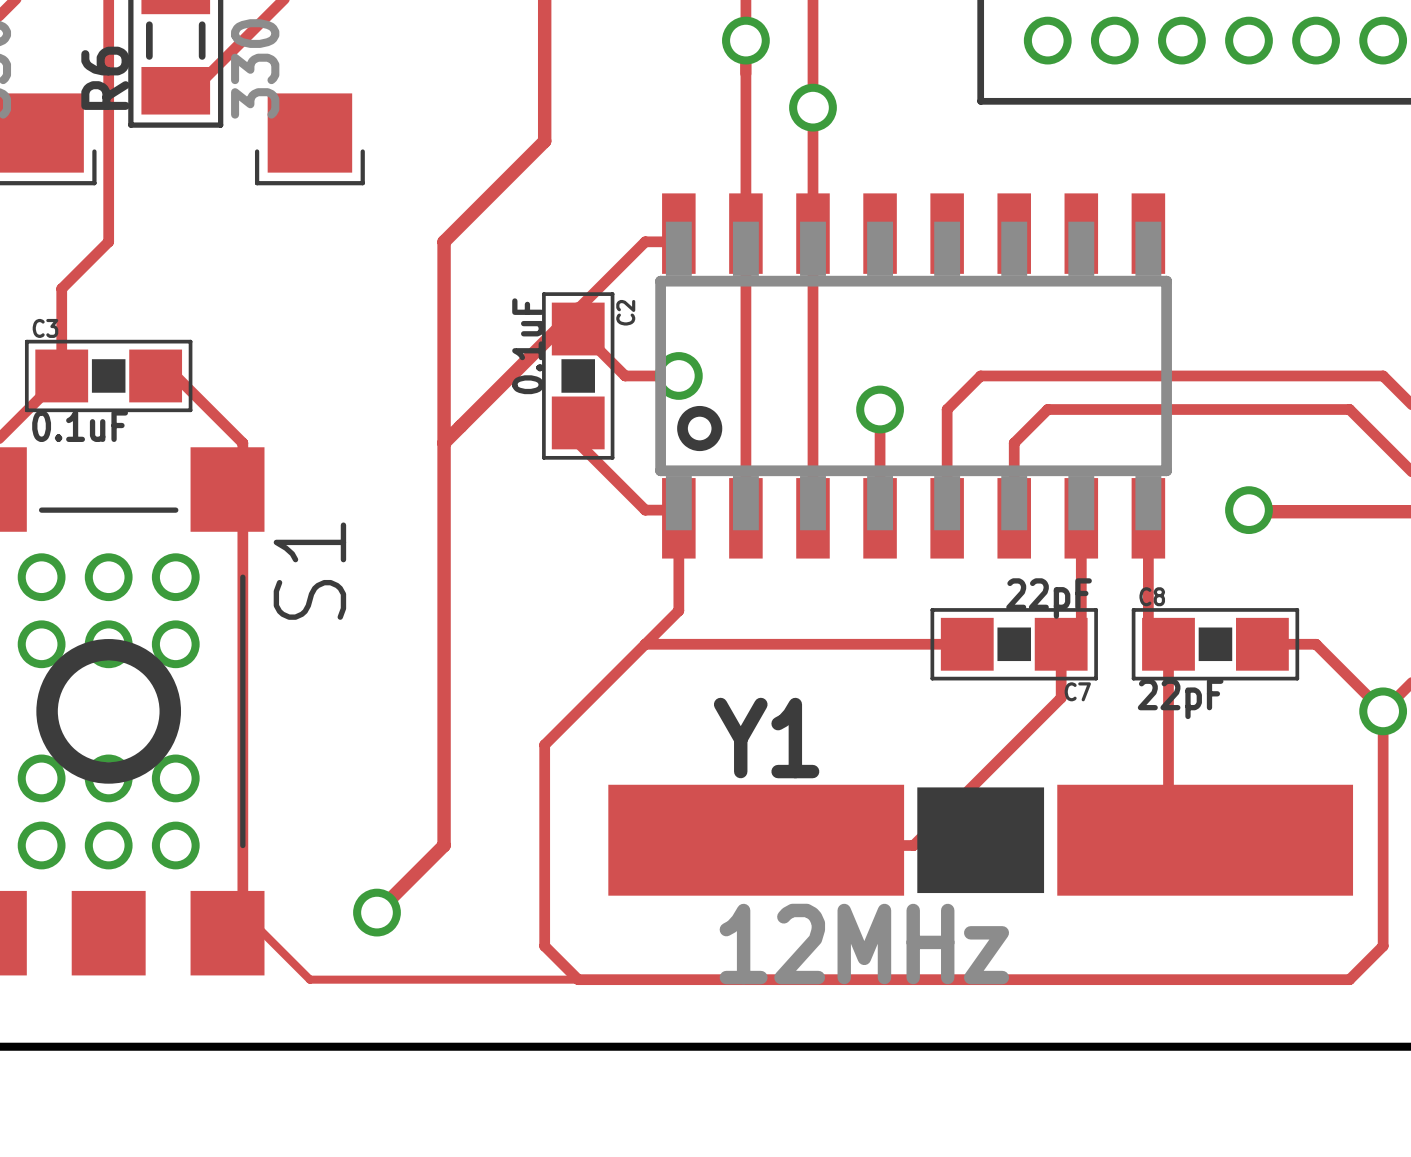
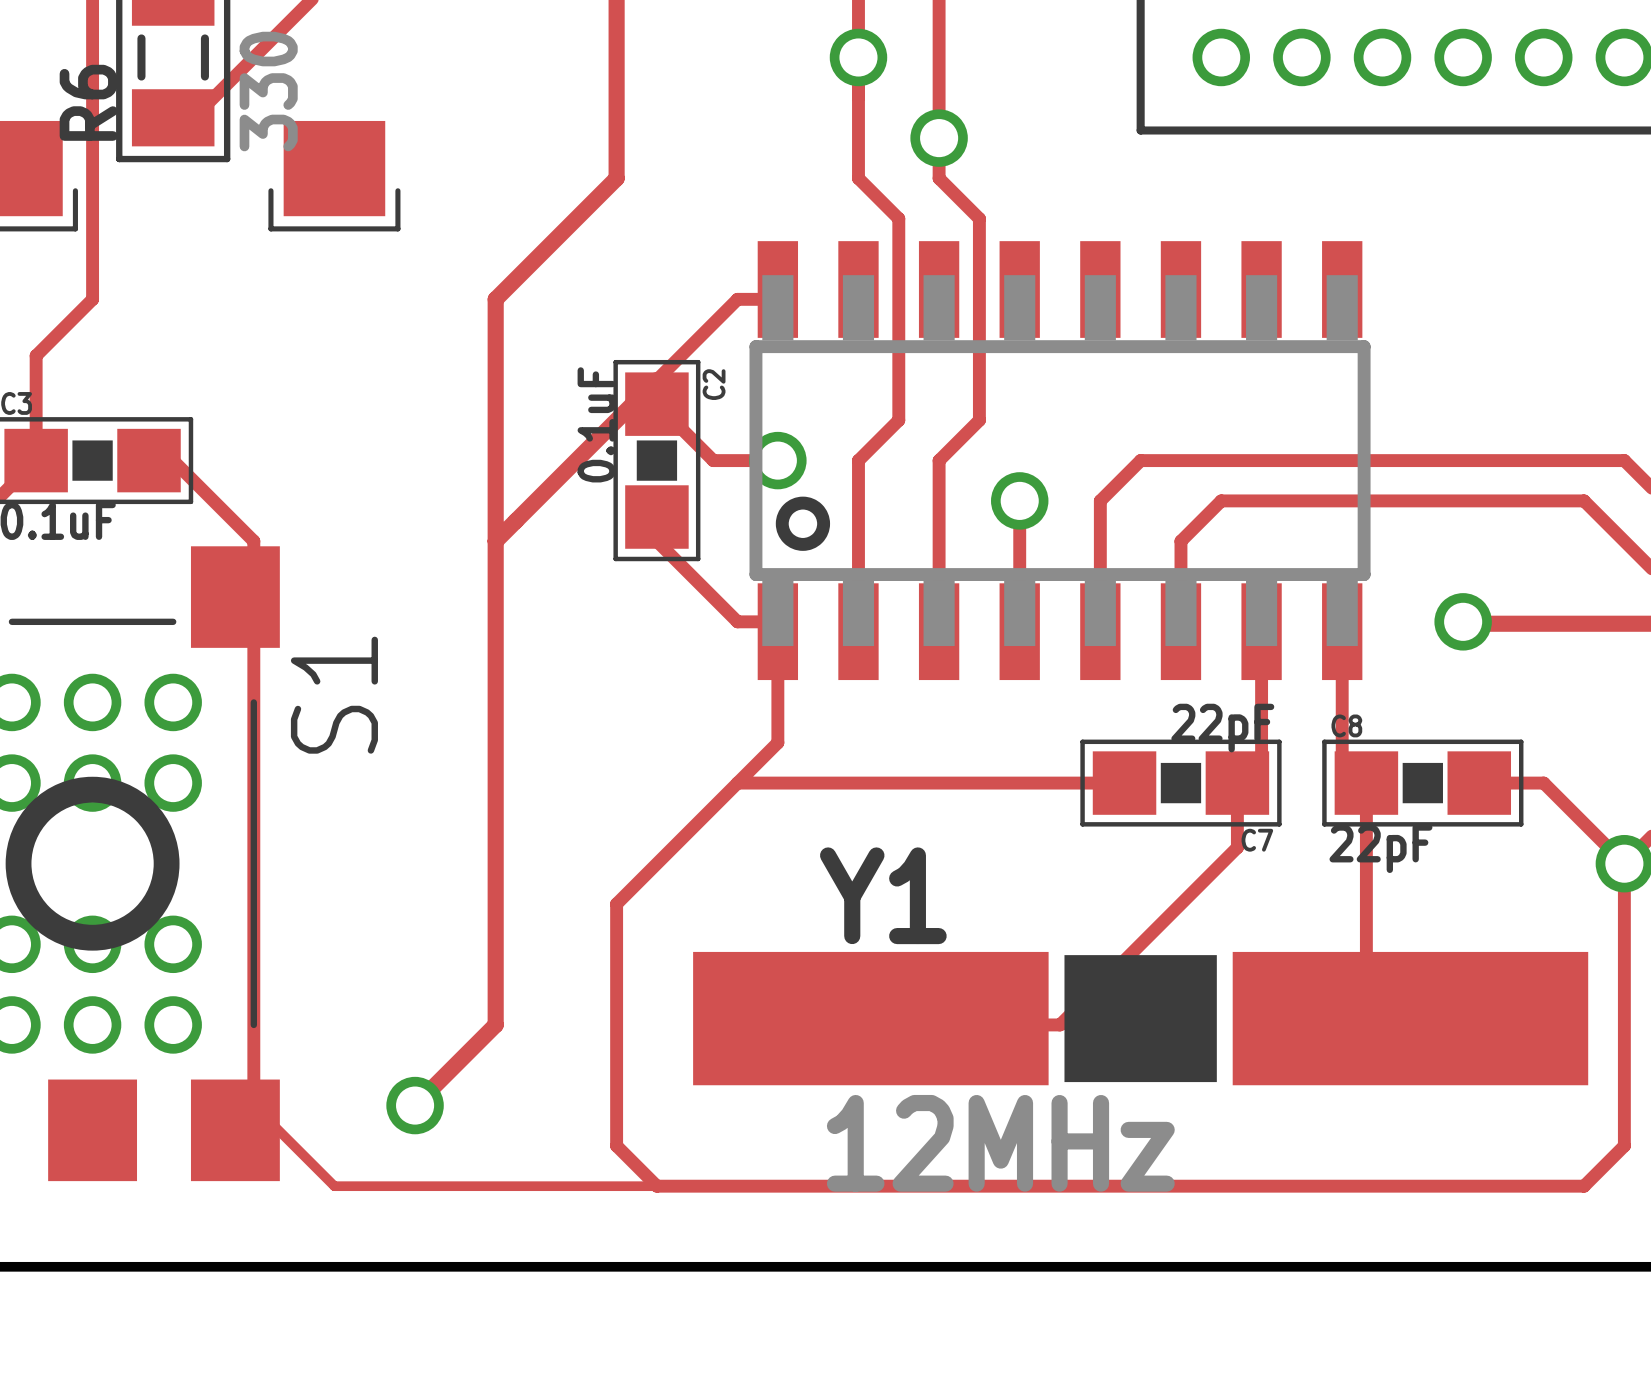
track: (745, 141) (745, 375) -> (858, 178) (898, 218) (898, 420) (858, 460)
track: (812, 141) (812, 375) -> (939, 178) (979, 218) (979, 420) (939, 460)

